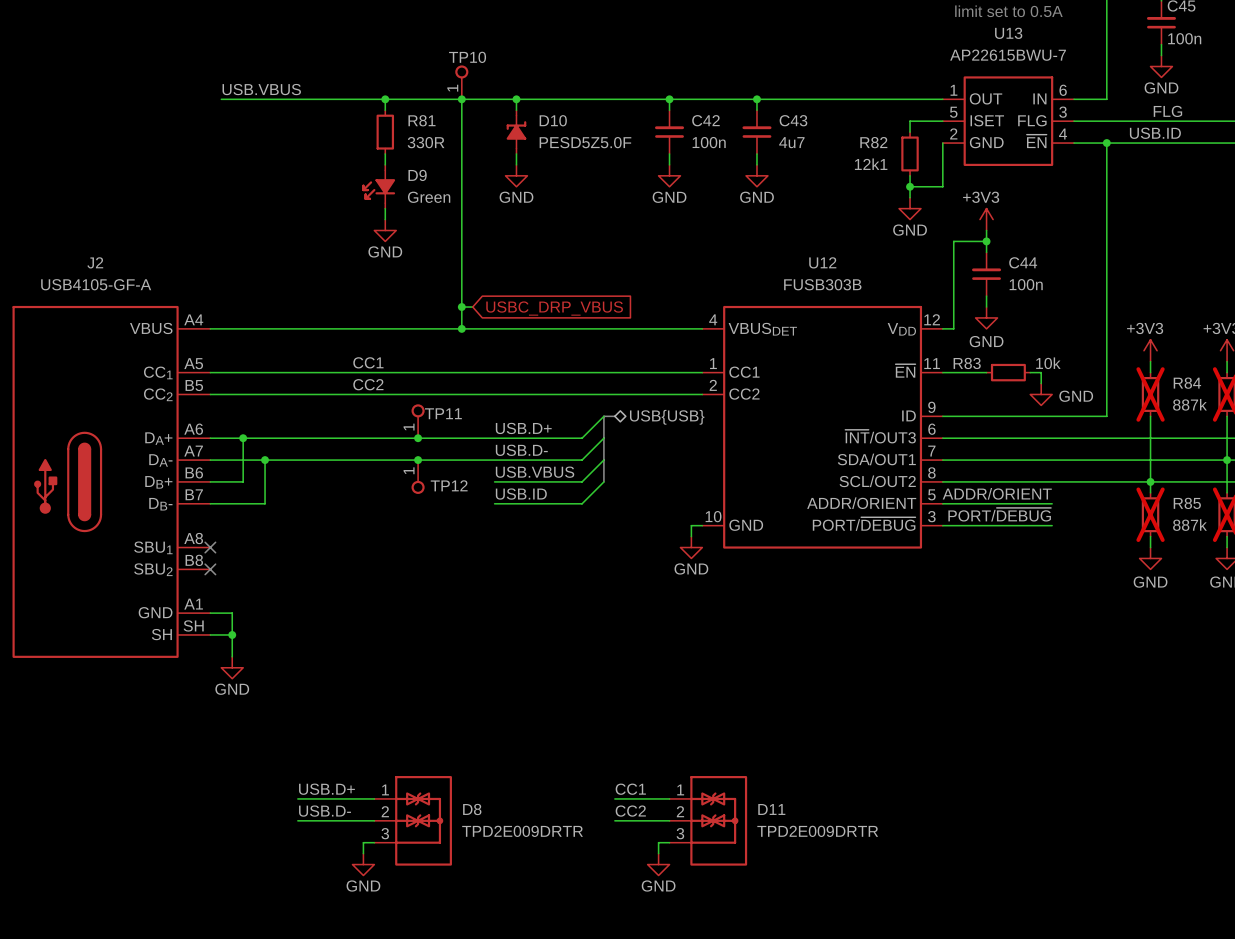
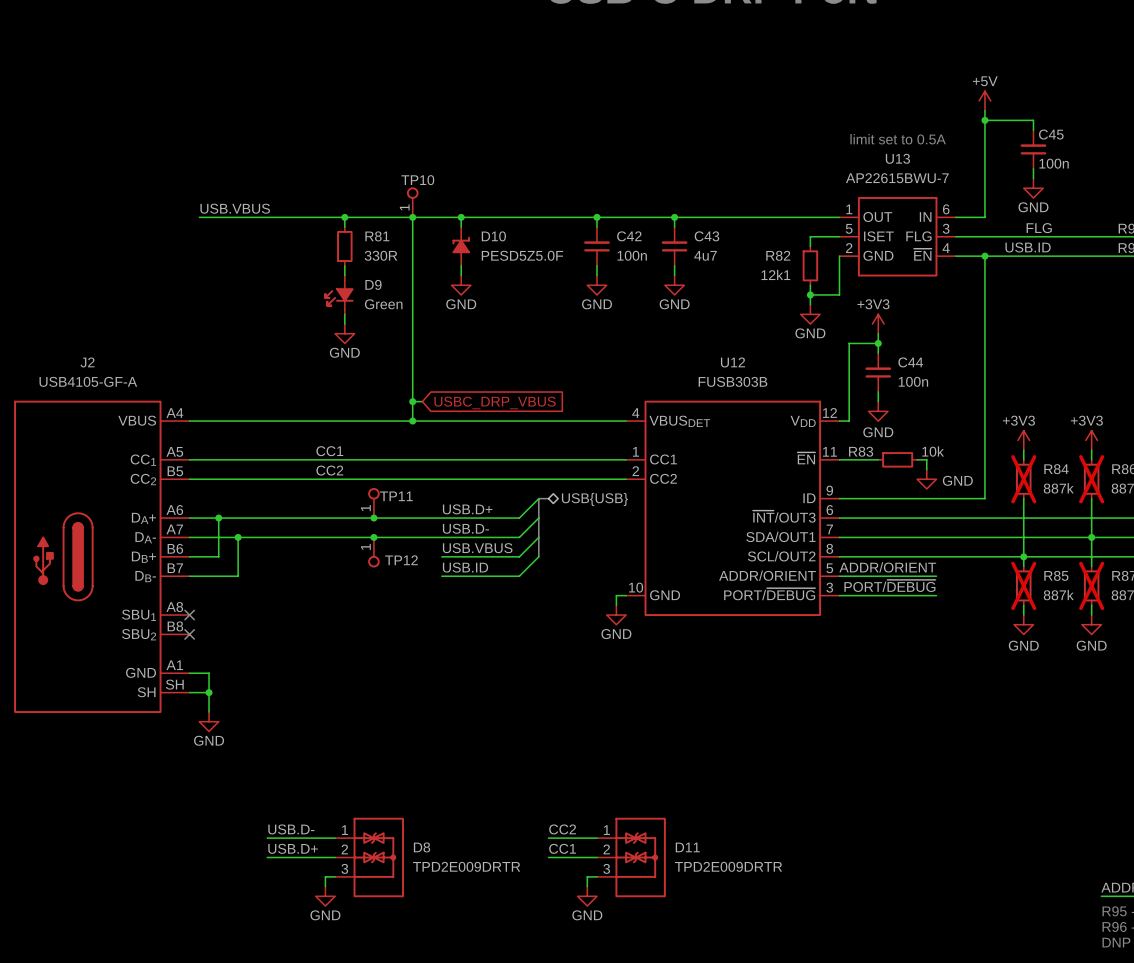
label: USB.D+ (326, 789) -> USB.D- (291, 829)
label: CC1 (630, 789) -> CC2 (562, 829)
label: USB.D- (325, 811) -> USB.D+ (293, 848)
label: CC2 (630, 811) -> CC1 (562, 848)

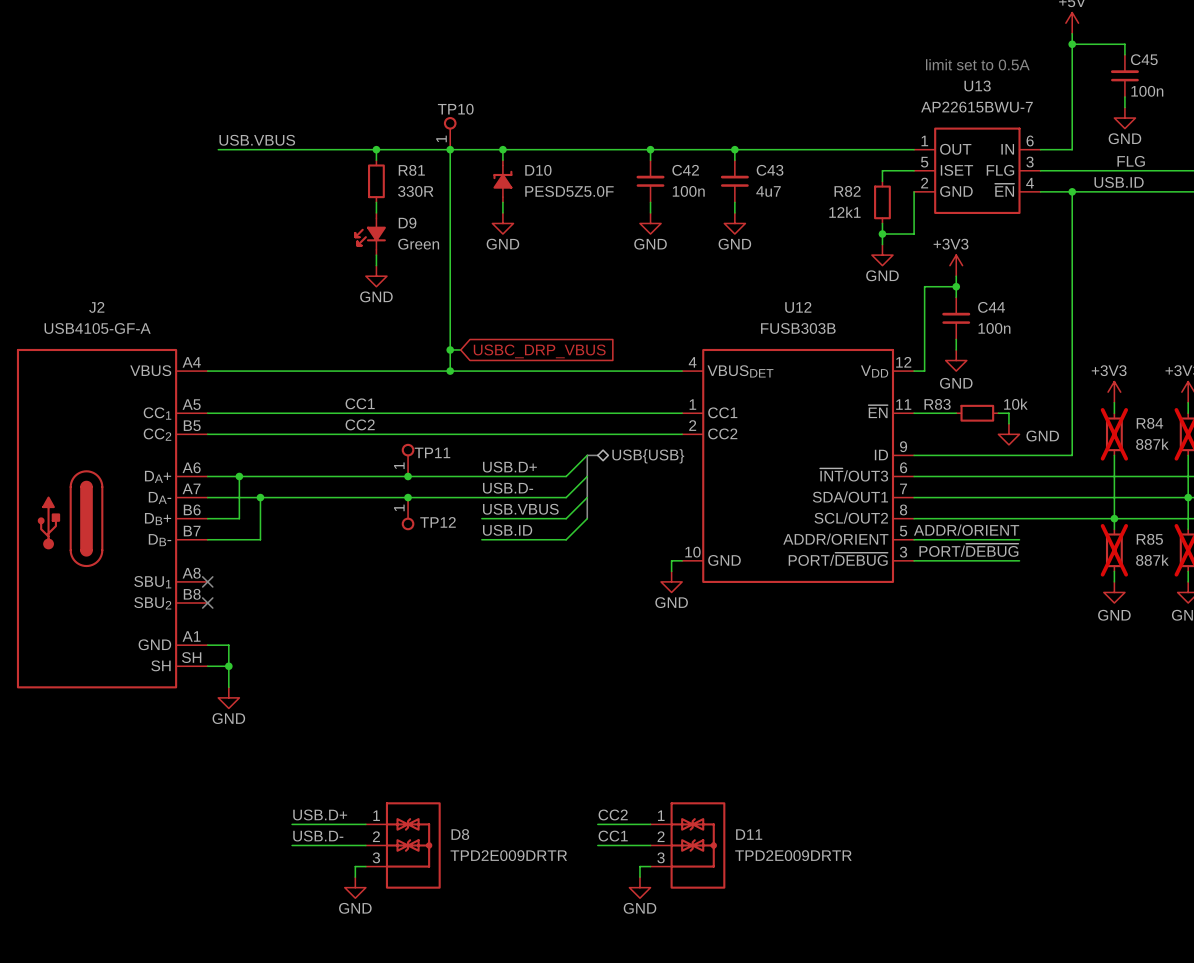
label: USB.D- (291, 829) -> USB.D+ (320, 814)
label: USB.D+ (293, 848) -> USB.D- (318, 836)

